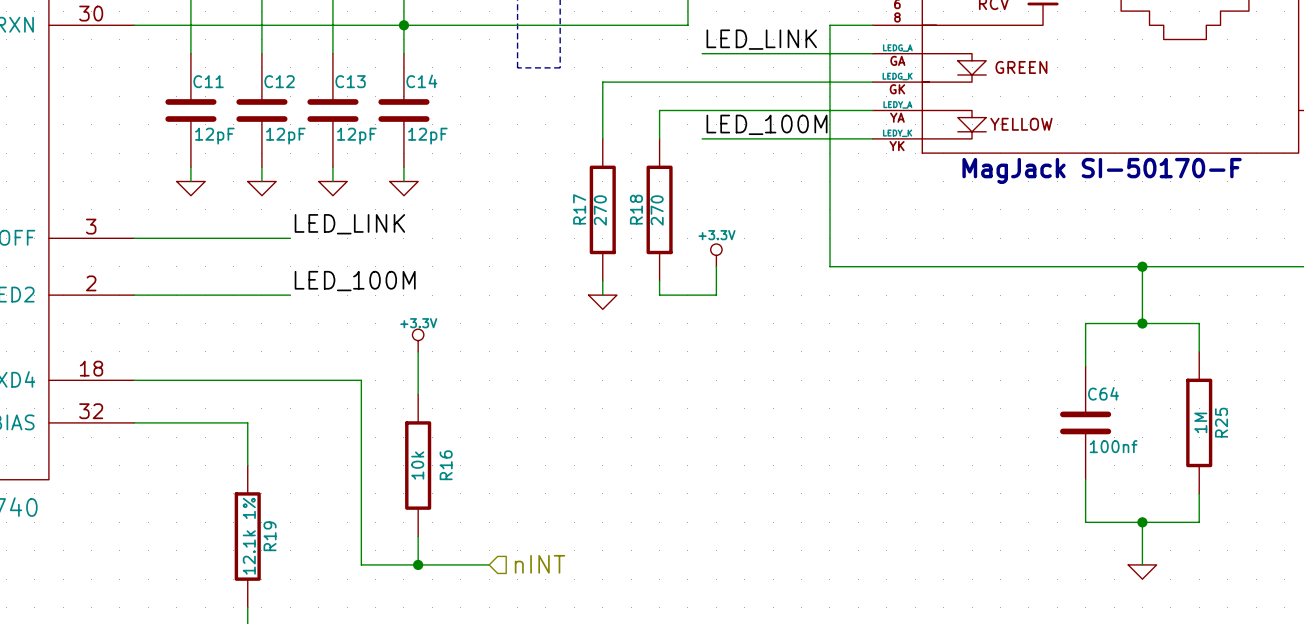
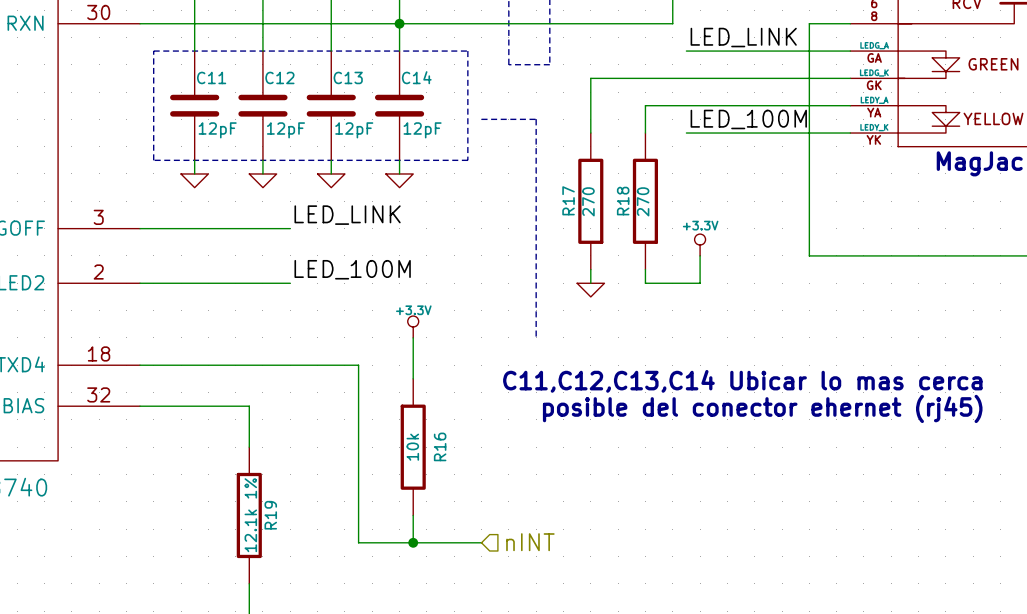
line: none -> (153, 51) (467, 51) (467, 160) (153, 160) (153, 51)
line: none -> (481, 119) (536, 119) (536, 337)
text: none -> C11,C12,C13,C14 Ubicar lo mas cerca (742, 381)
text: none -> posible del conector ehernet (rj45) (762, 408)

